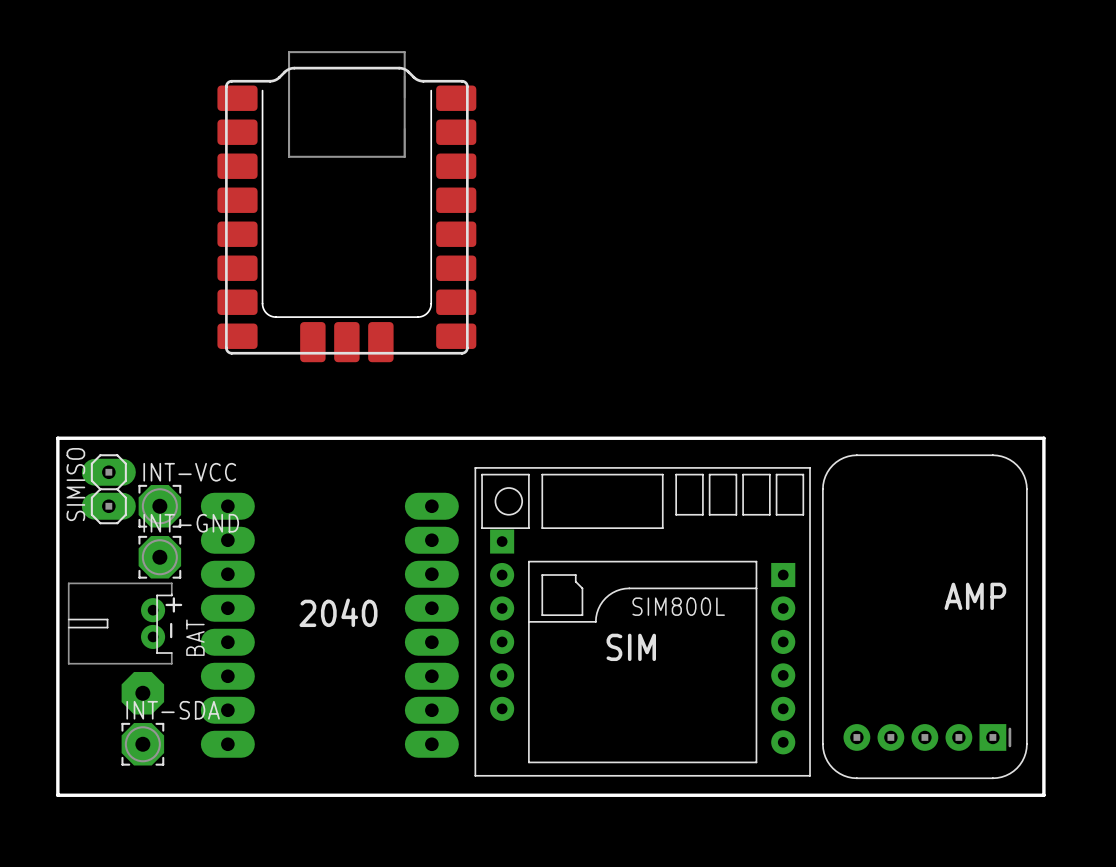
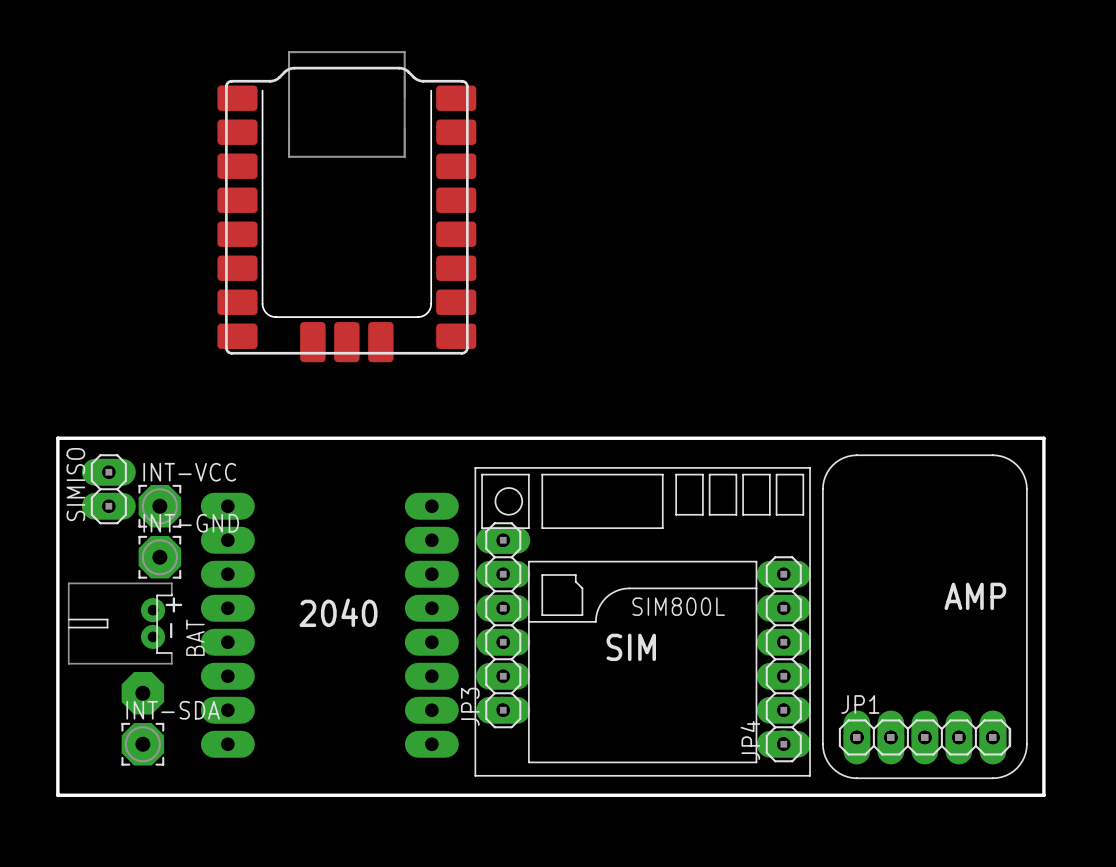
JP3: none -> (503, 625)
JP4: none -> (783, 659)
JP1: none -> (924, 737)

